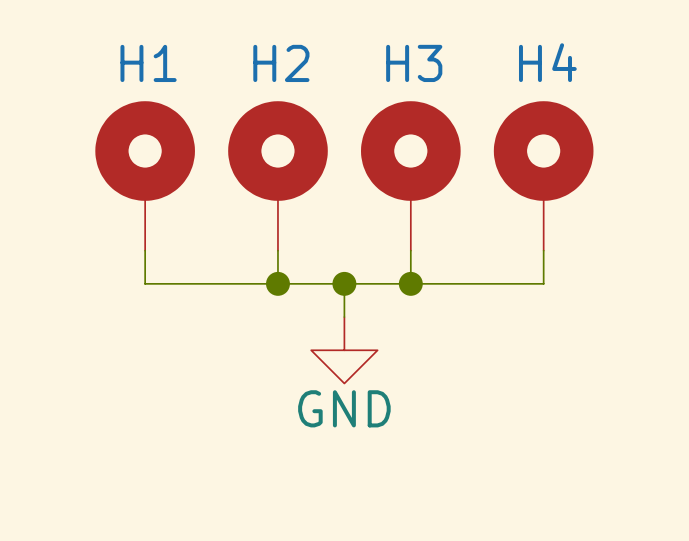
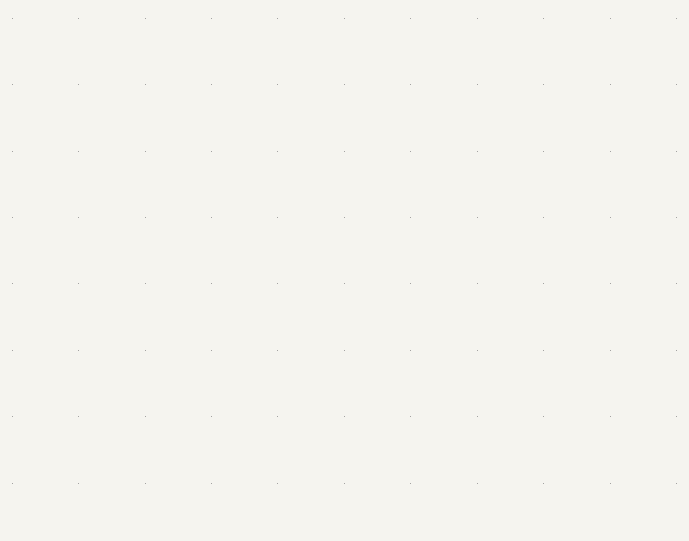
H1: (145, 175) -> none
H2: (277, 175) -> none
H3: (410, 175) -> none
H4: (543, 175) -> none
wire: (145, 250) (145, 283) (543, 283) (543, 250) -> none
wire: (277, 250) (277, 283) -> none
wire: (410, 250) (410, 283) -> none
junction: (277, 283) -> none
wire: (344, 283) (344, 317) -> none
junction: (344, 283) -> none
junction: (410, 283) -> none
power symbol: GND (344, 350) -> none

